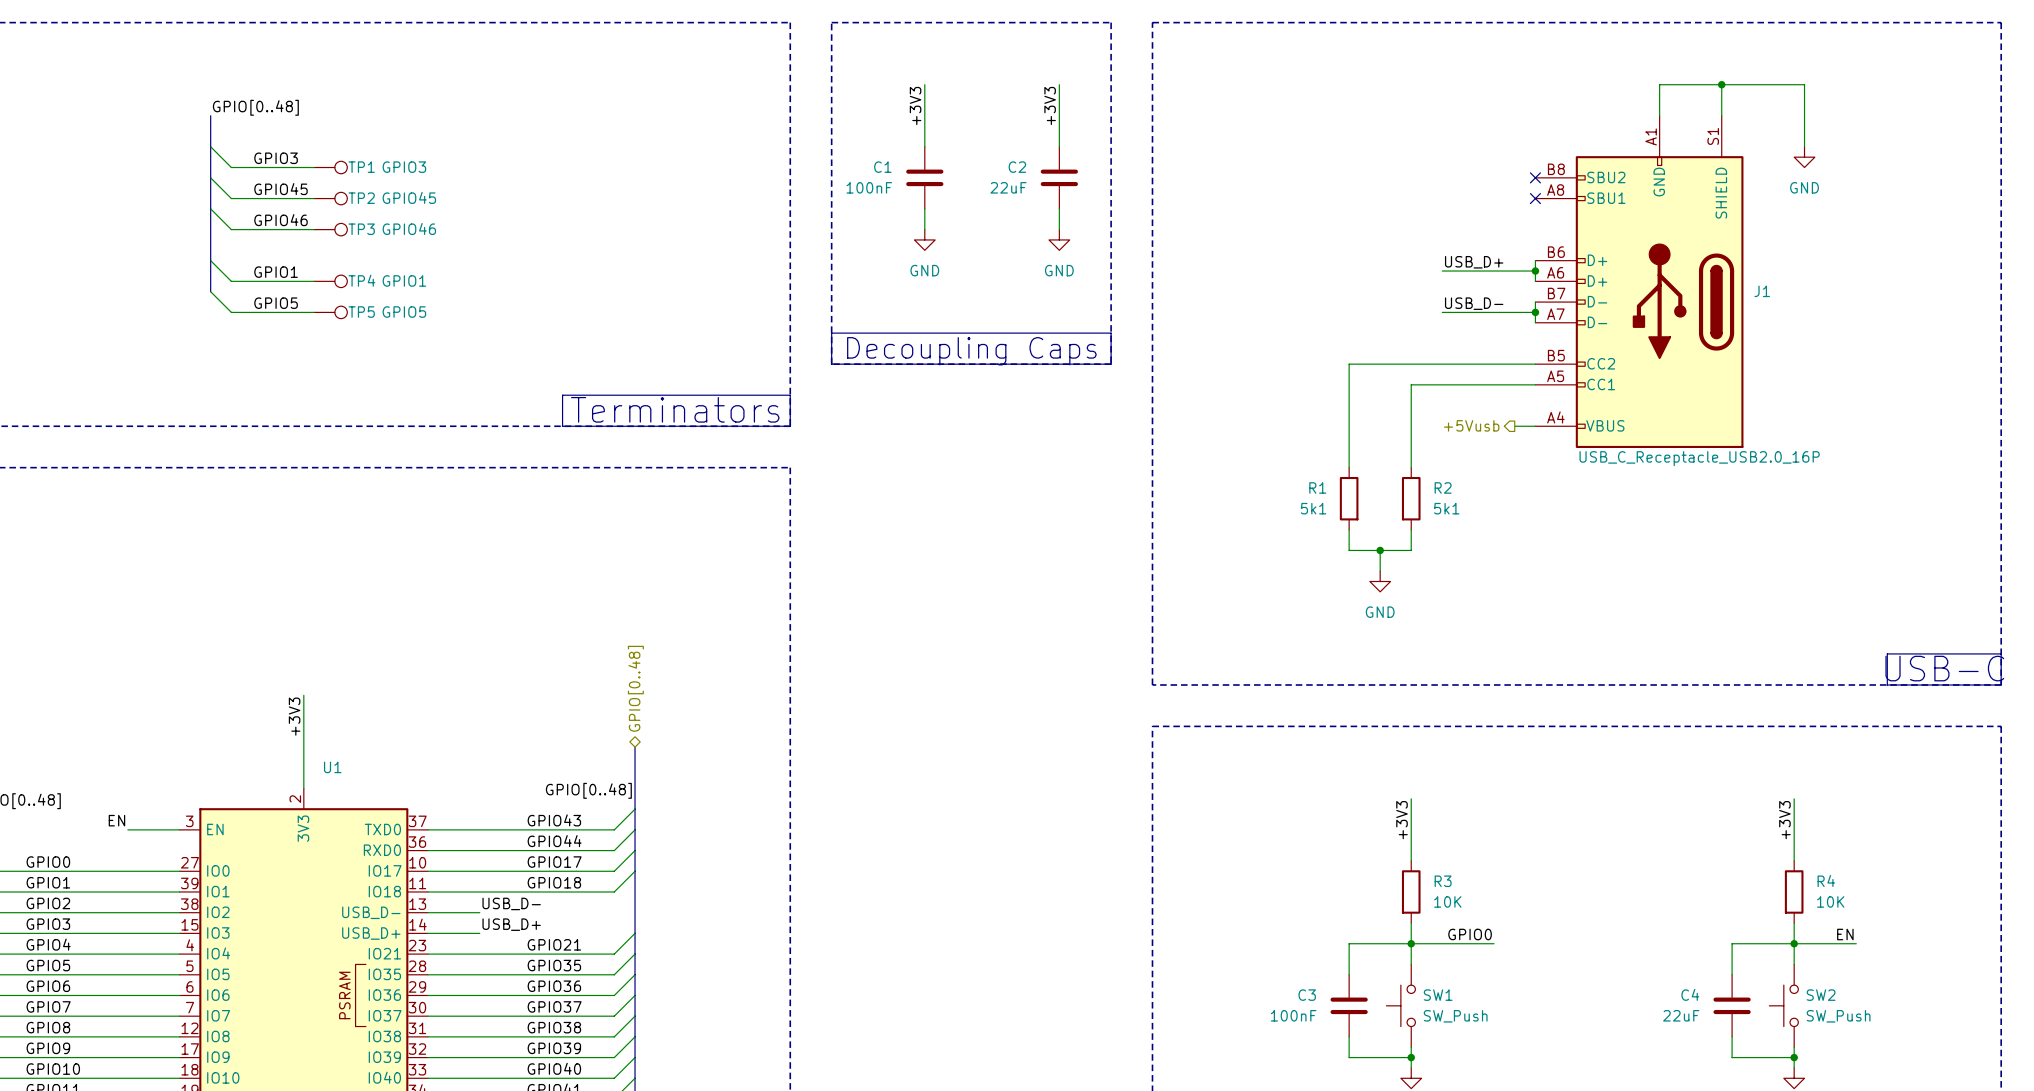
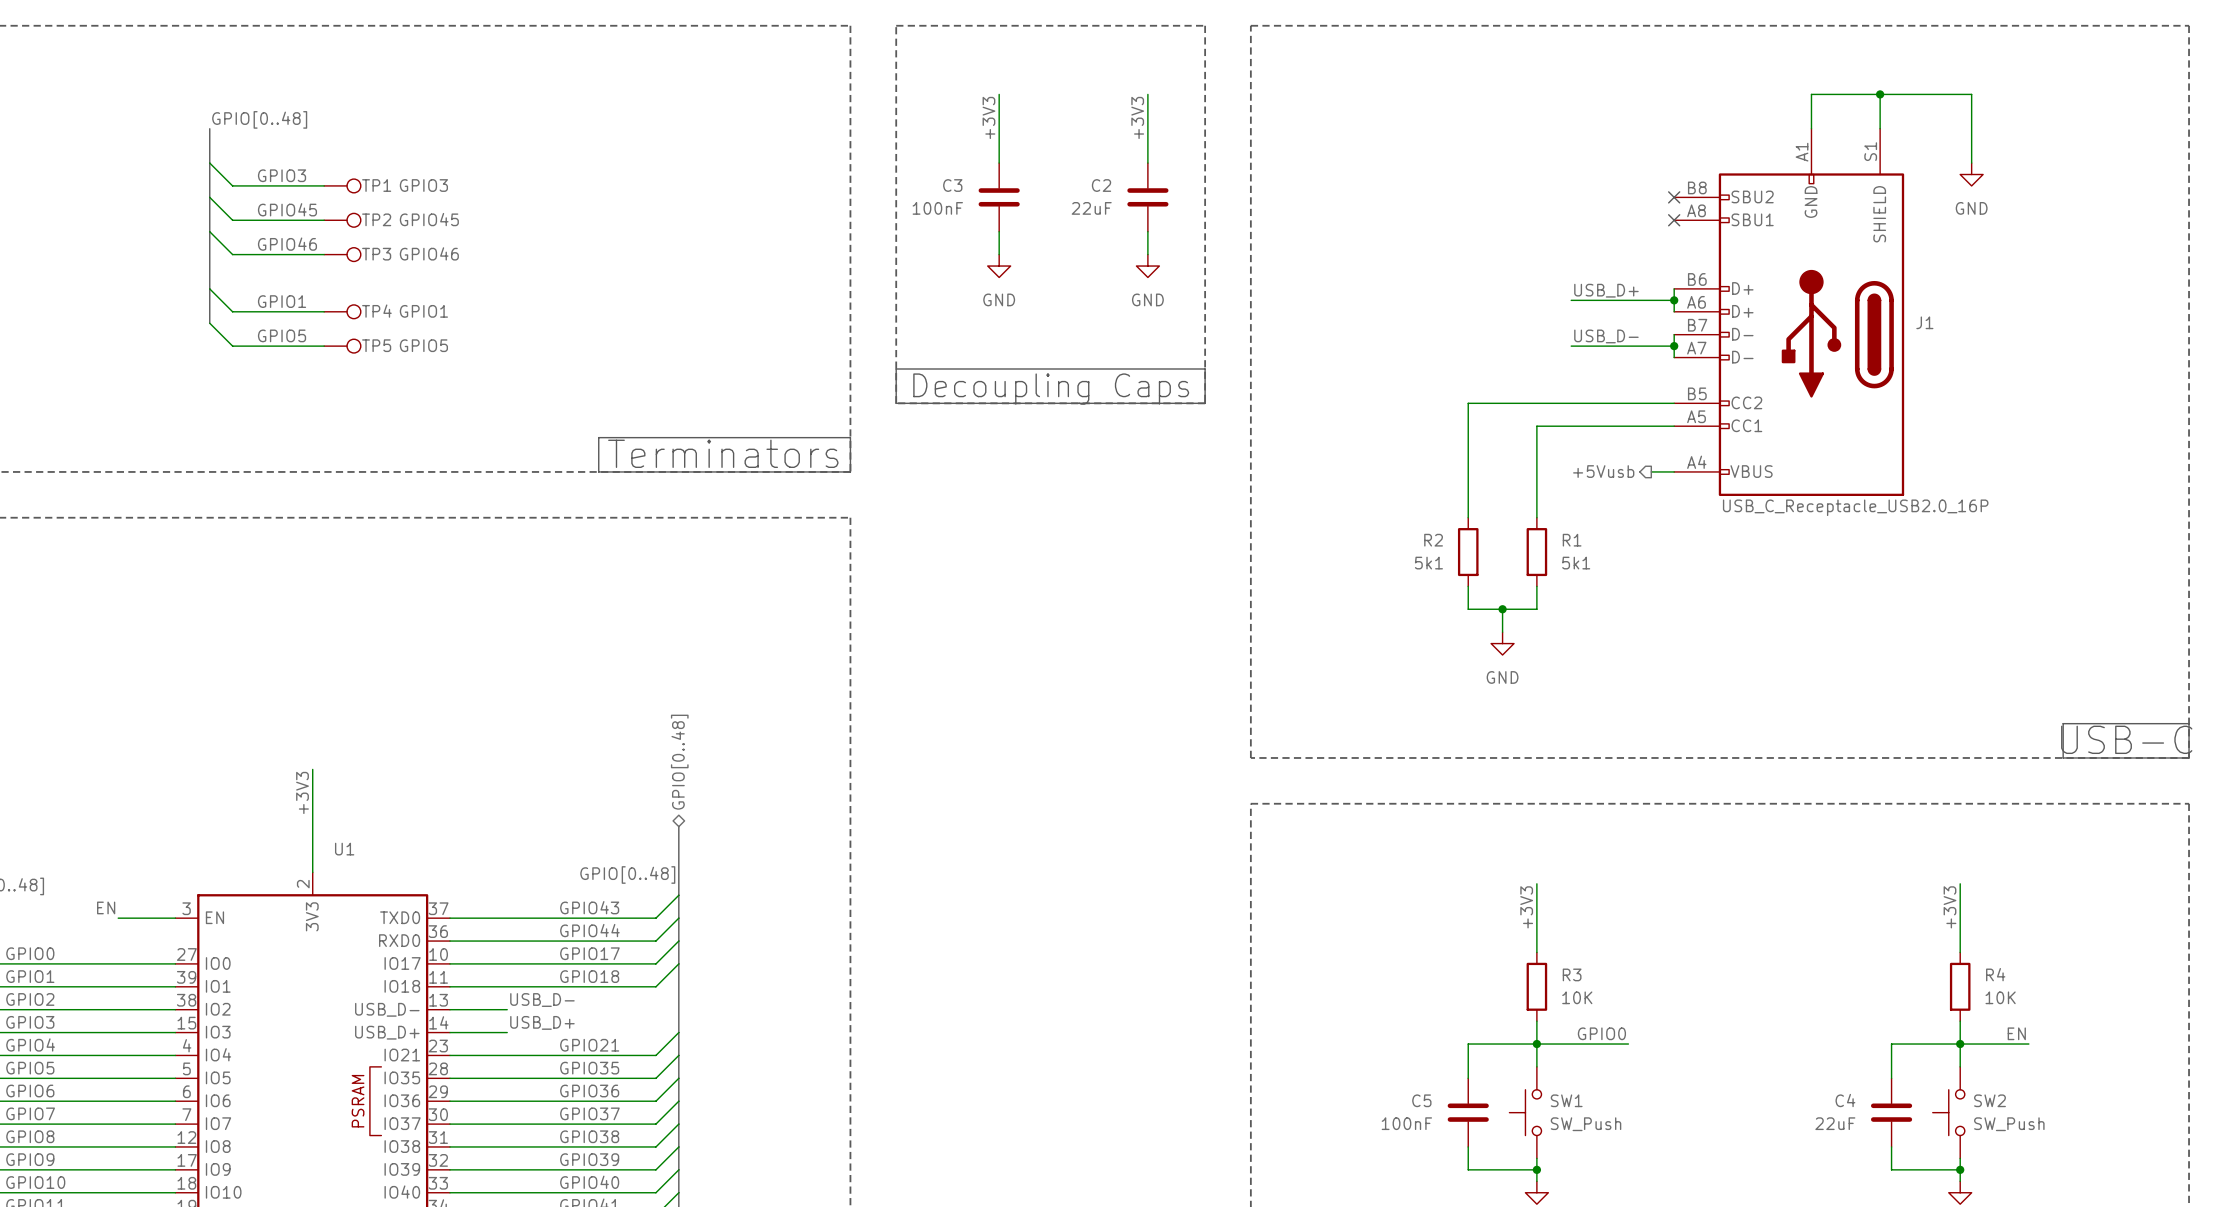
C1 name: C1 (882, 167) -> C3 (952, 185)
R1 name: R1 (1317, 487) -> R2 (1433, 540)
R2 name: R2 (1443, 487) -> R1 (1572, 540)
C3 name: C3 (1307, 995) -> C5 (1421, 1100)

